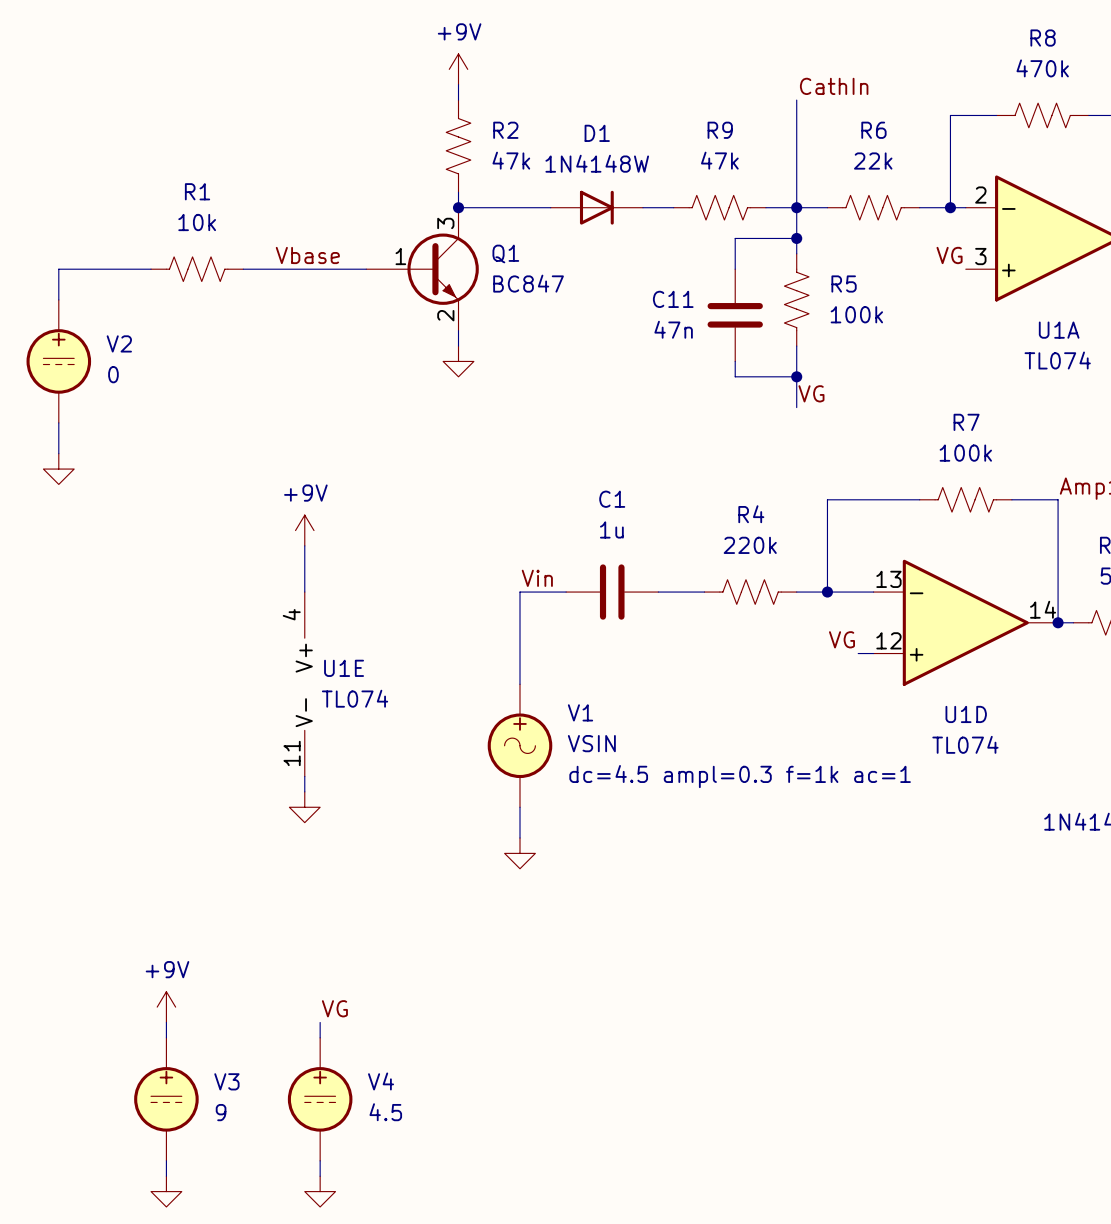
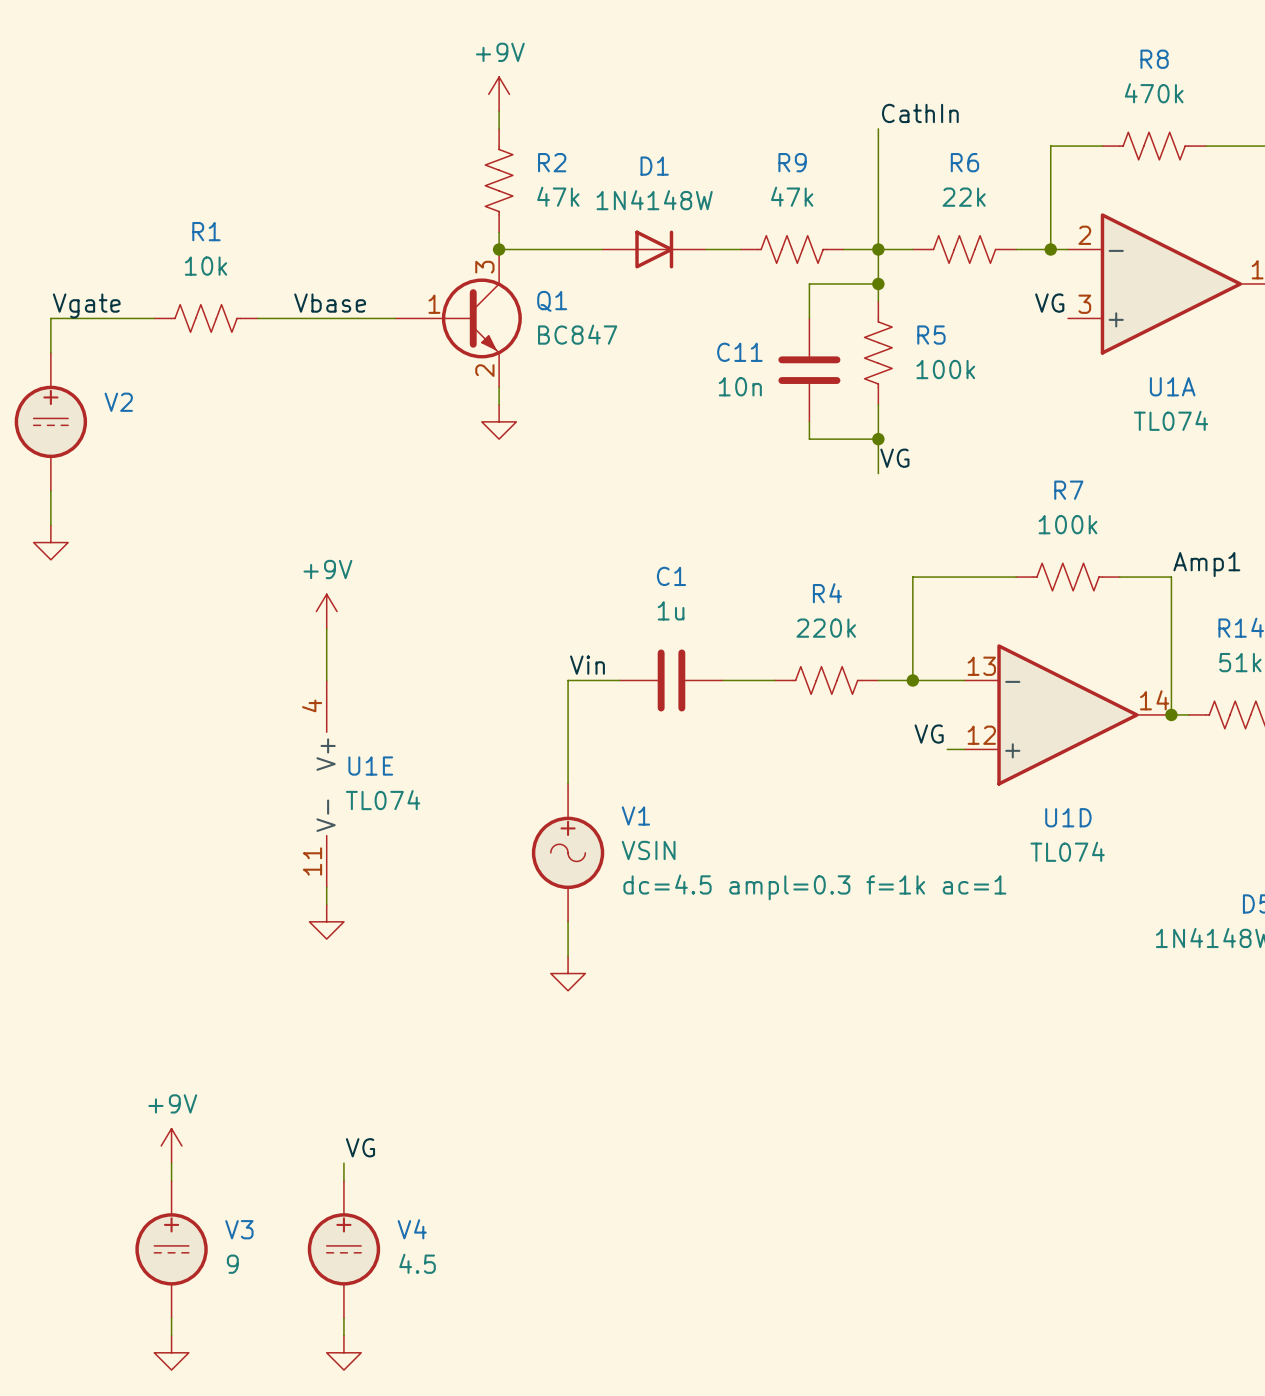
label: none -> Vgate (86, 305)
C11 value: 47n (673, 329) -> 10n (740, 386)
V2 value: 0 (113, 374) -> none

